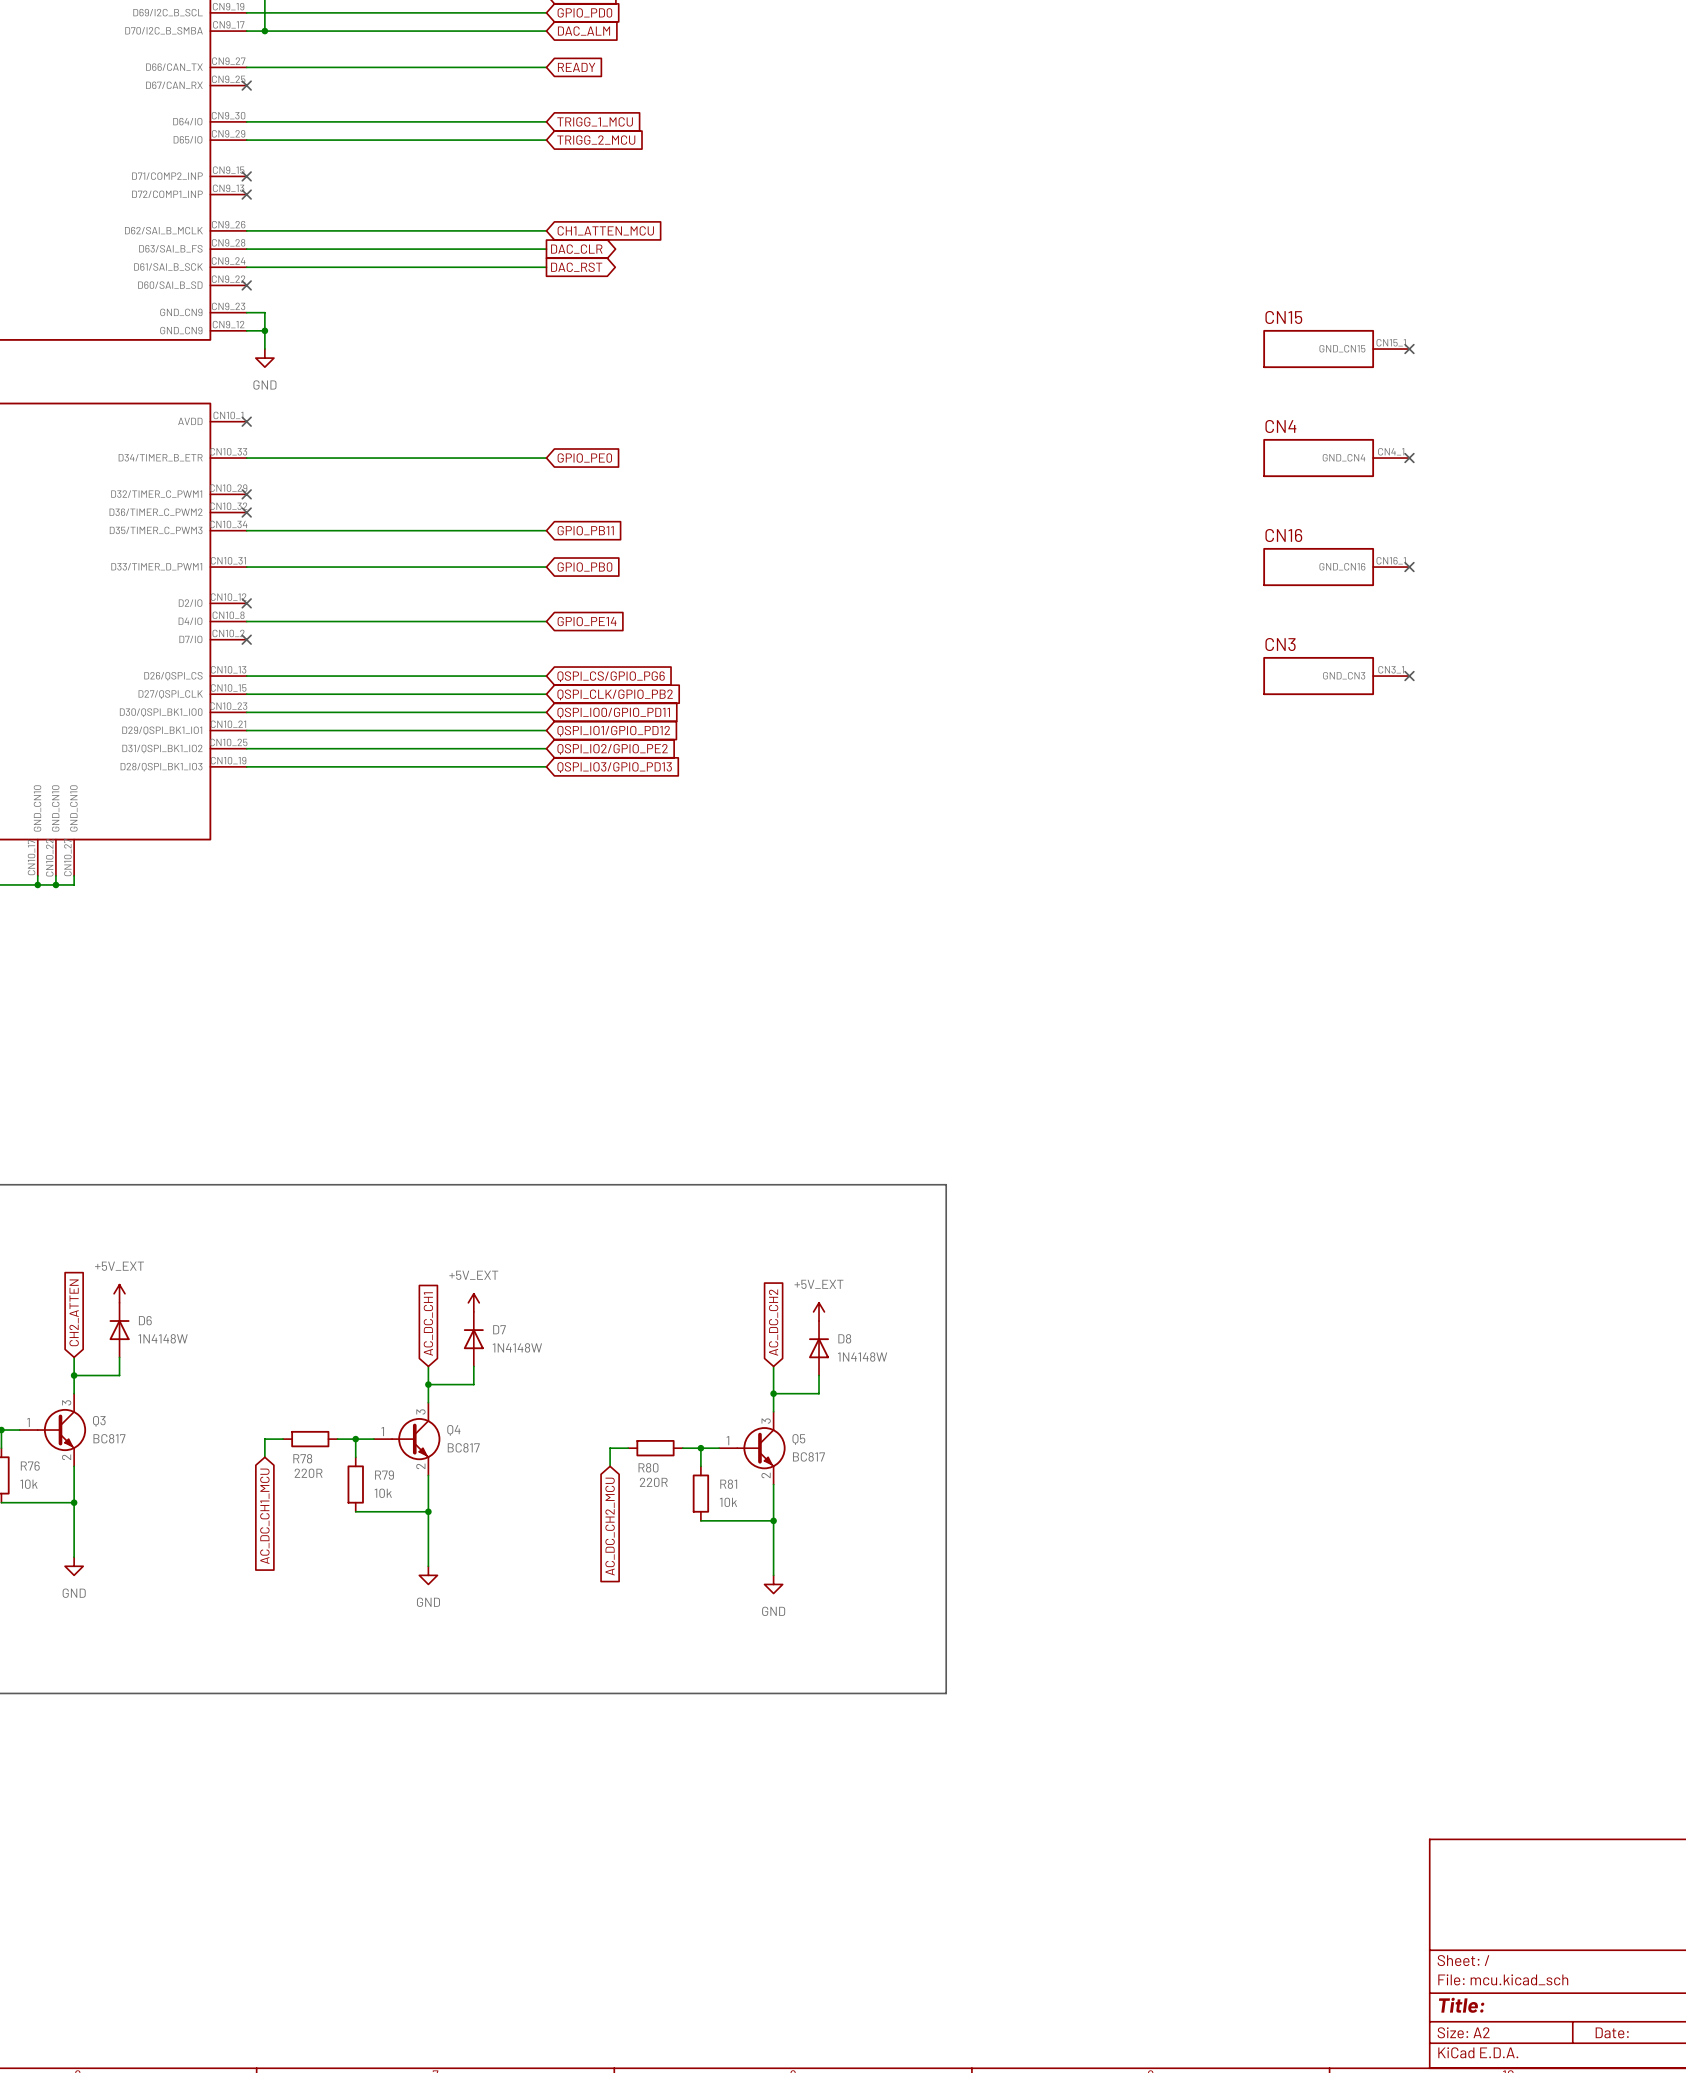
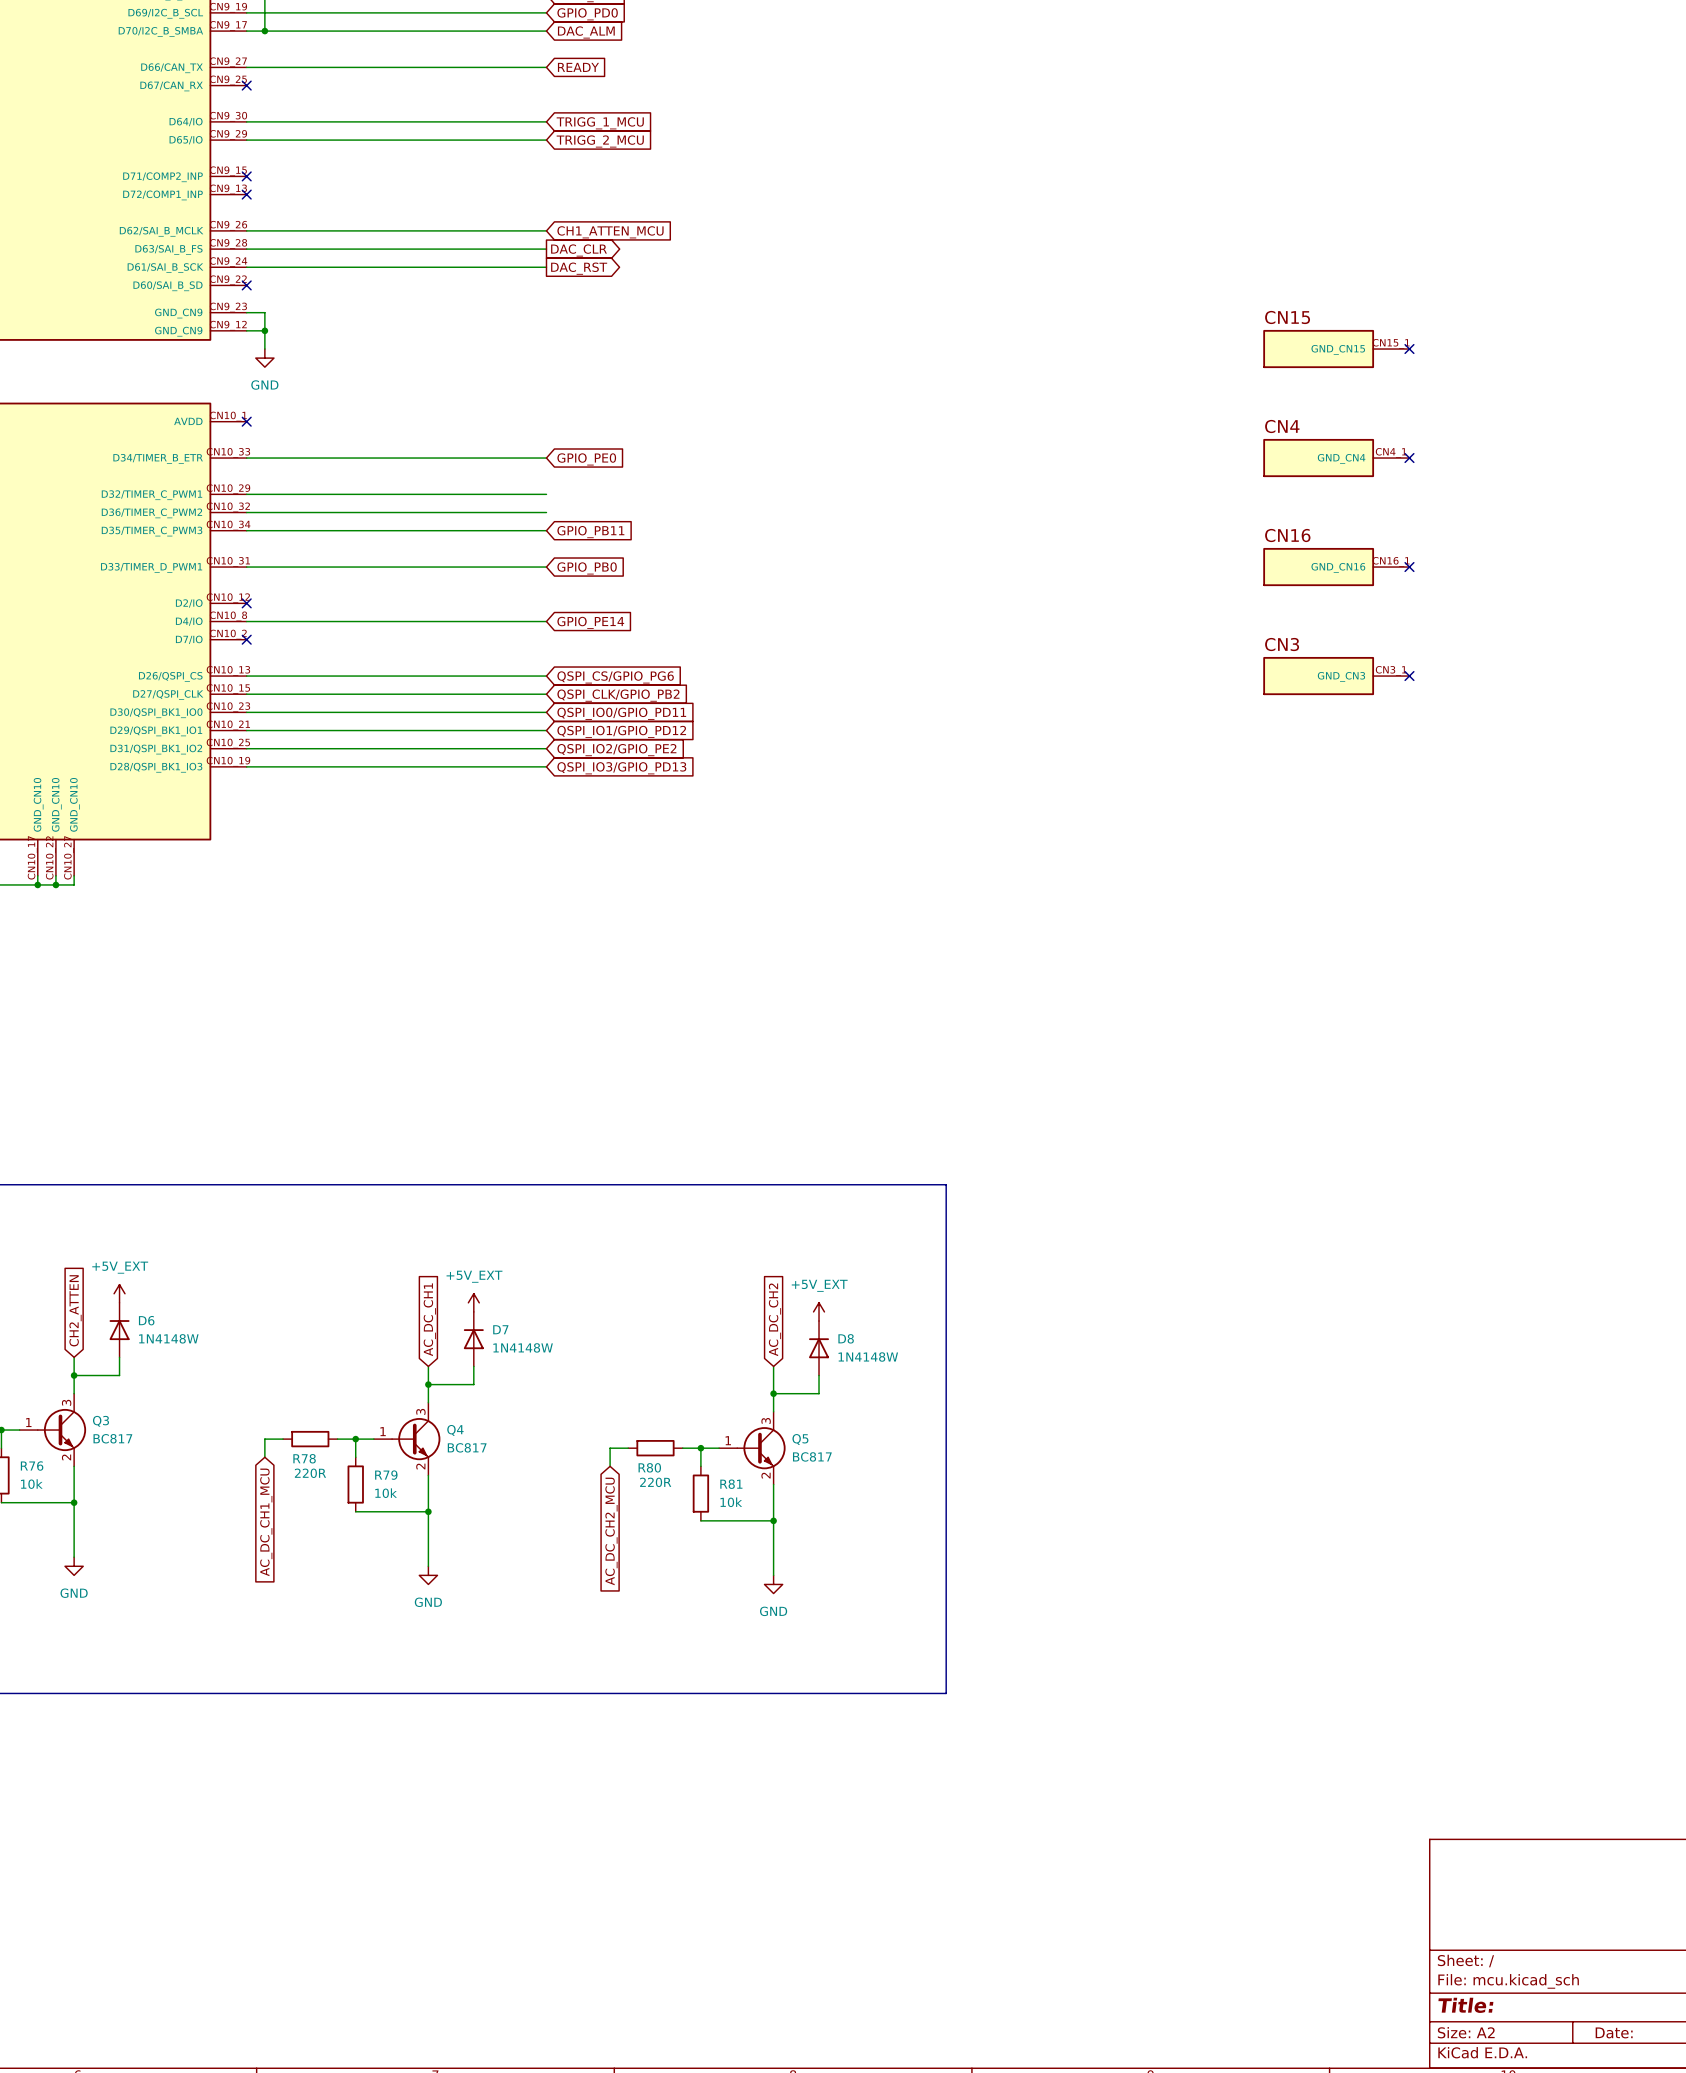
wire: none -> (246, 494) (546, 494)
no-connect mark: (246, 494) -> none
wire: none -> (246, 512) (546, 512)
no-connect mark: (246, 512) -> none

